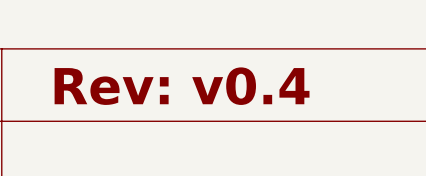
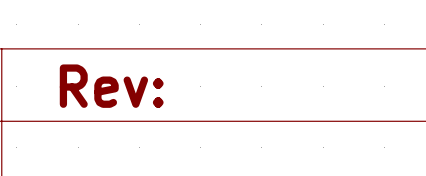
title block: Rev: v0.4 (182, 86) -> Rev: (111, 86)

